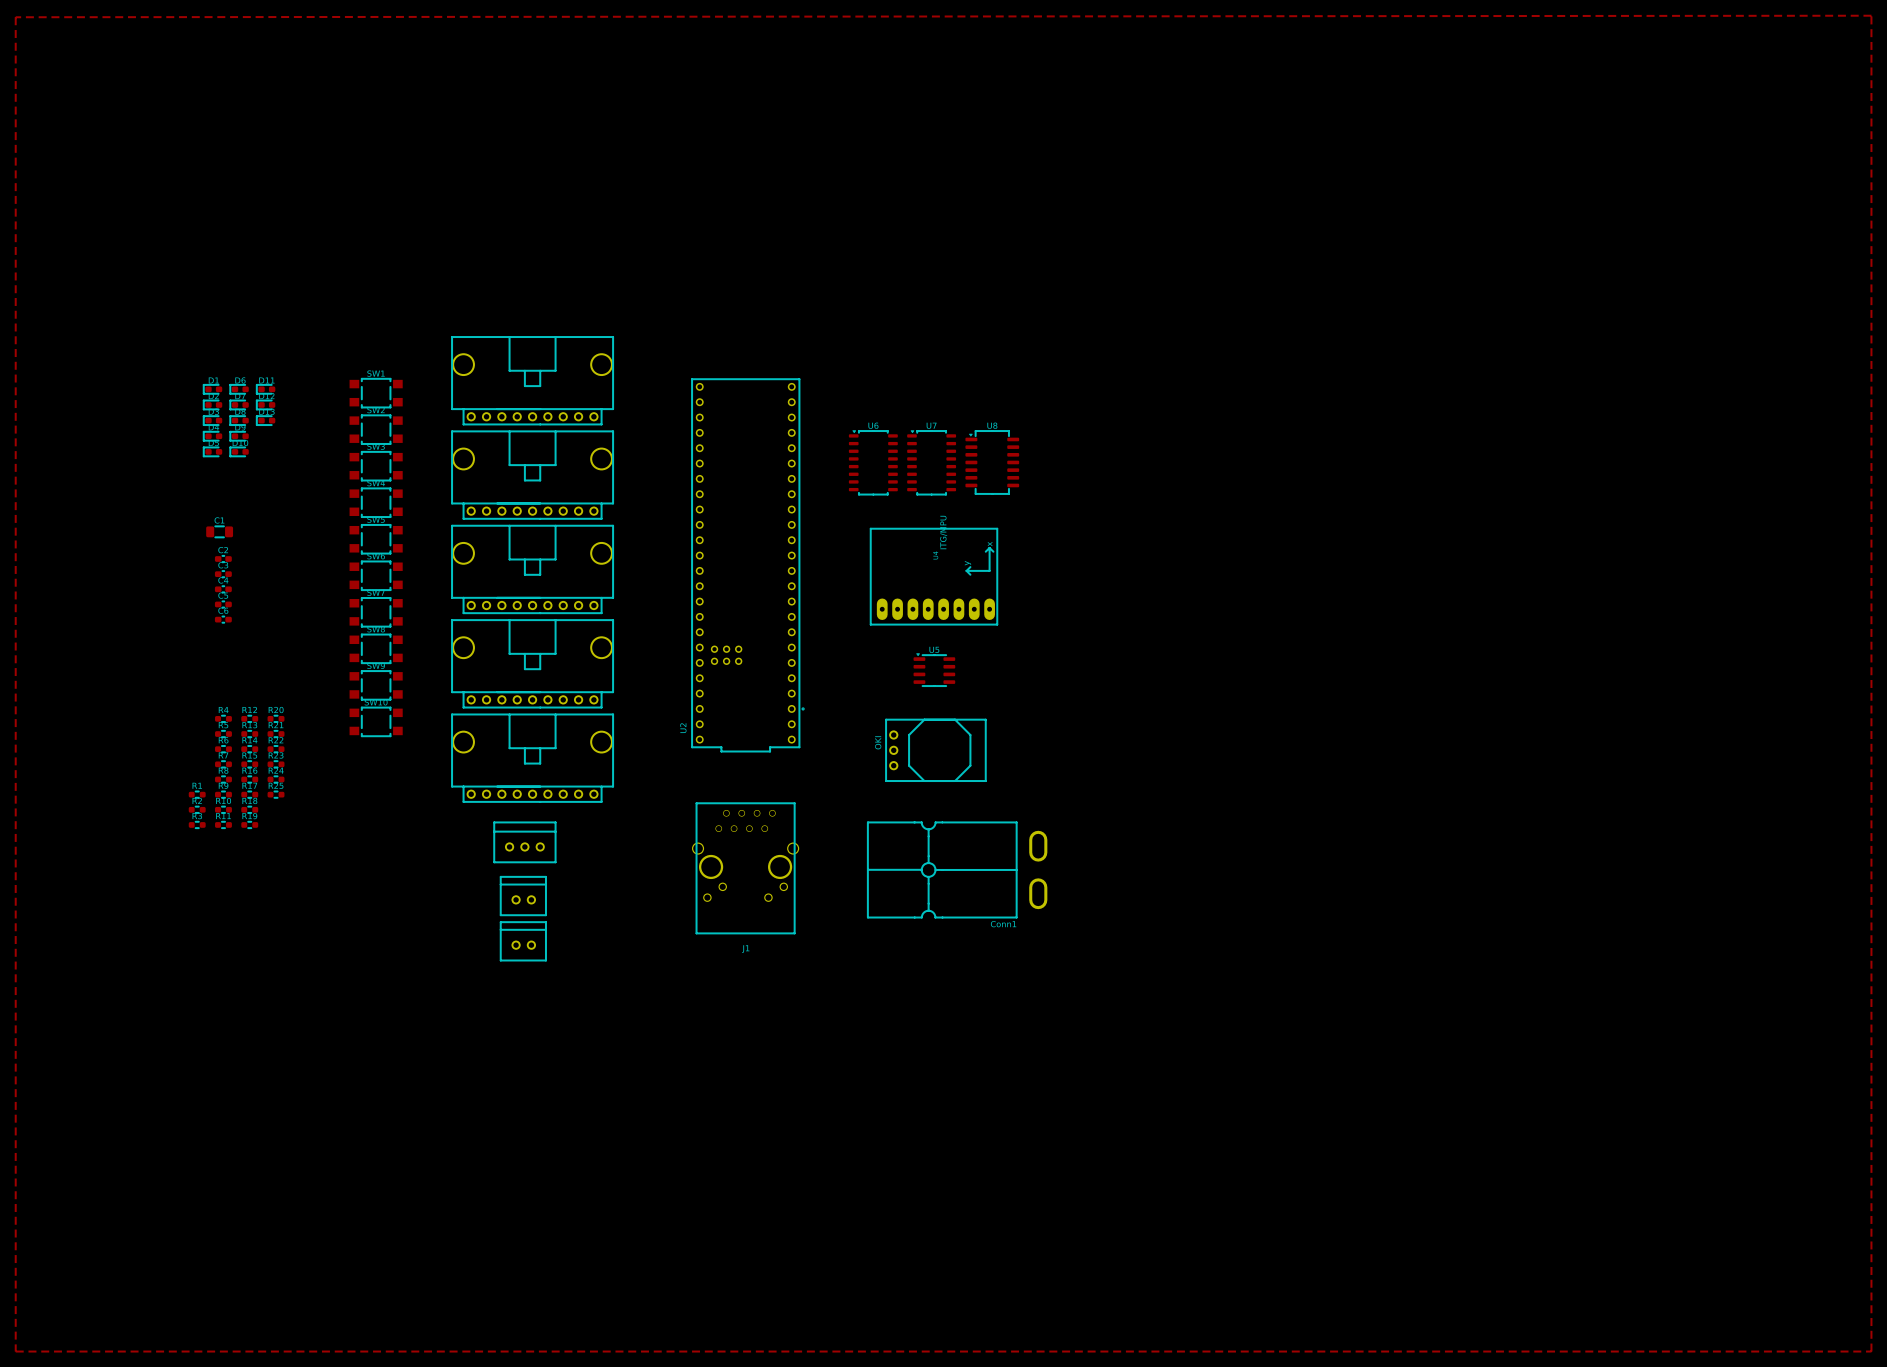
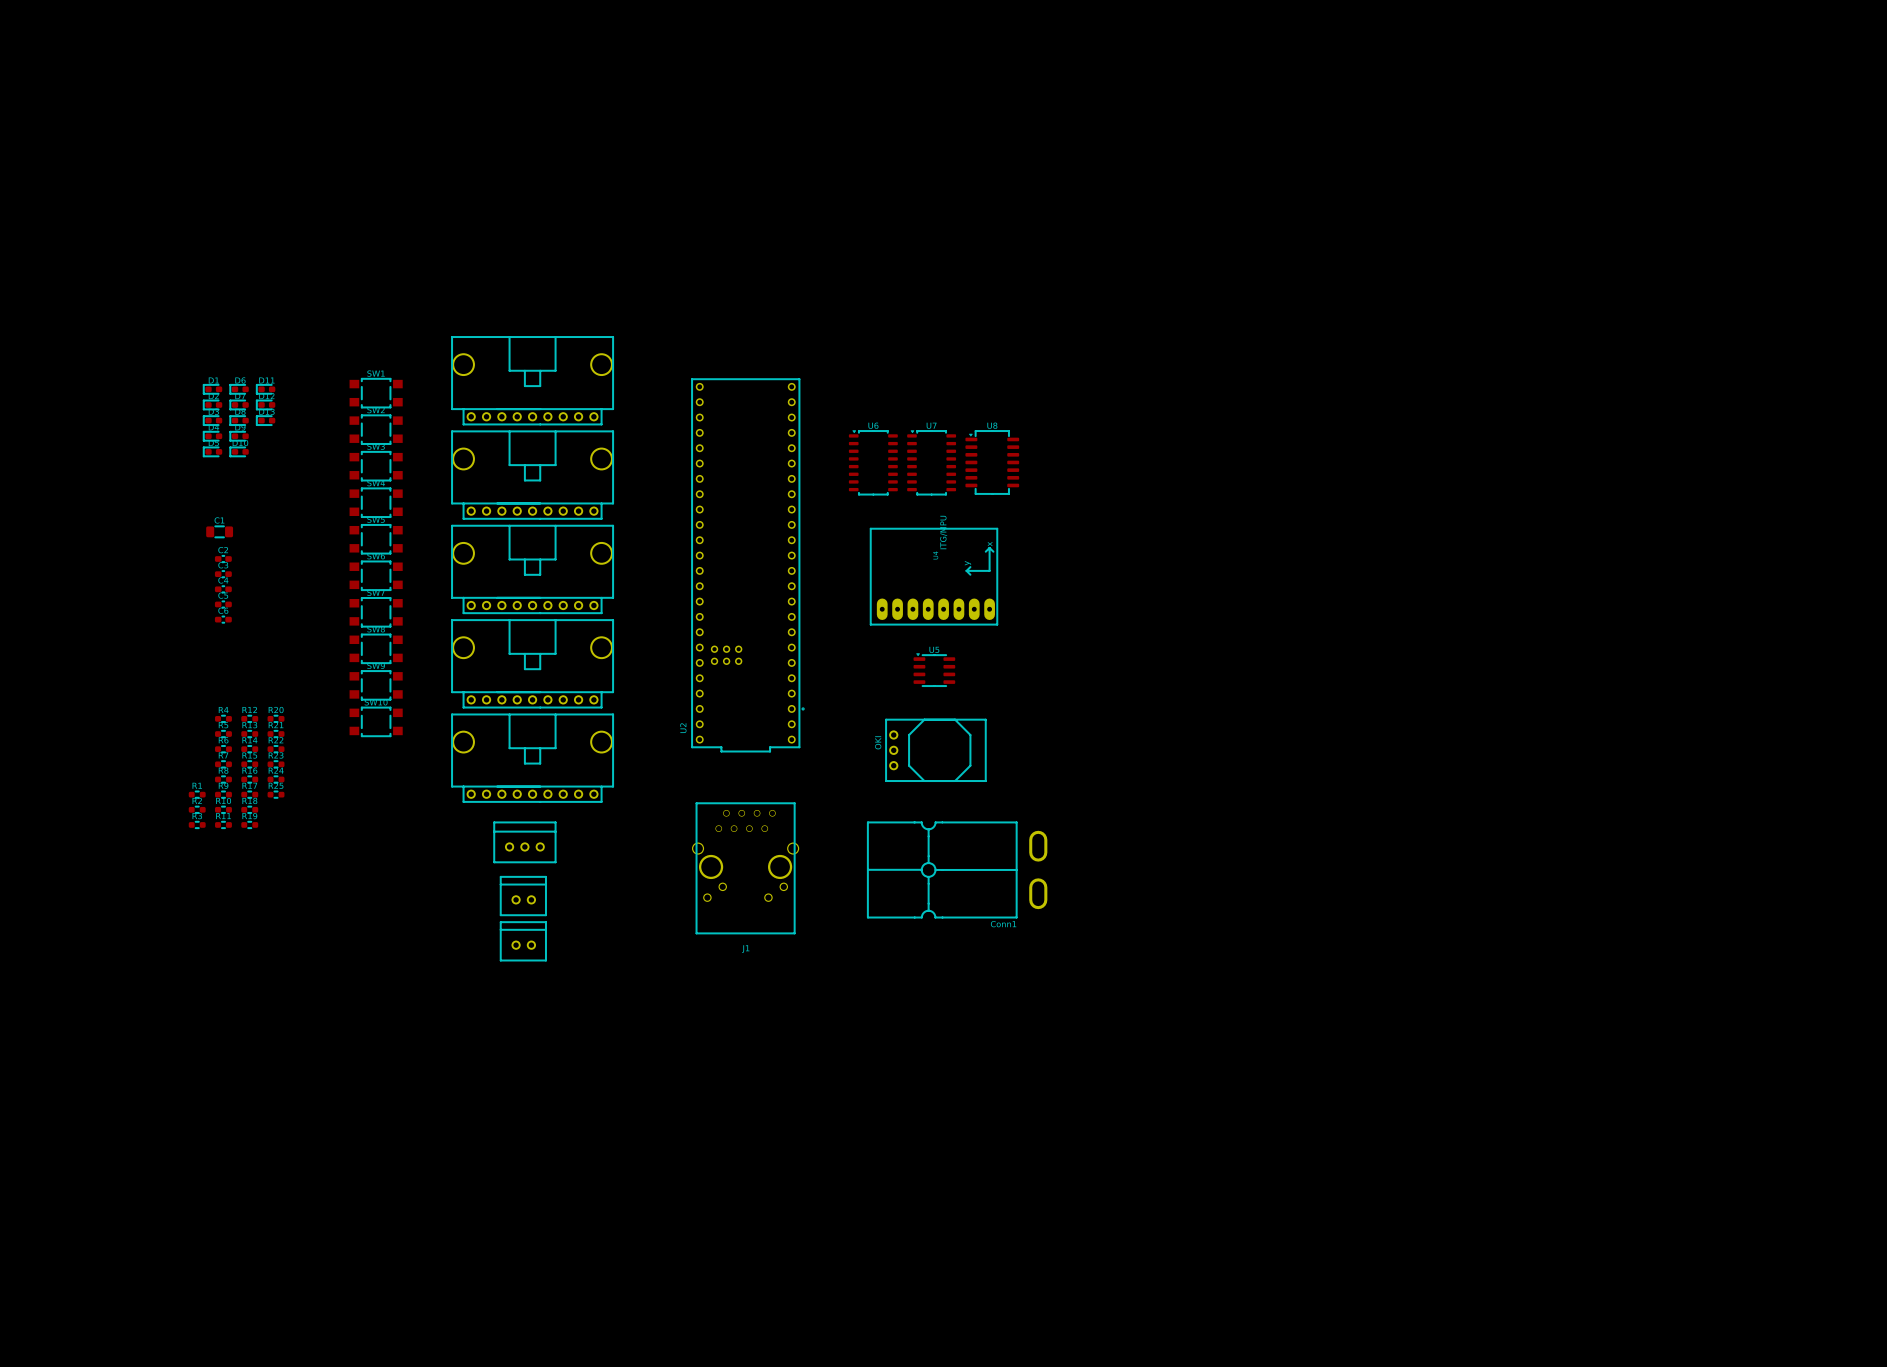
zone outline: (1871, 15) (15, 17) (15, 1351) (1871, 1351) (1871, 15) -> none

